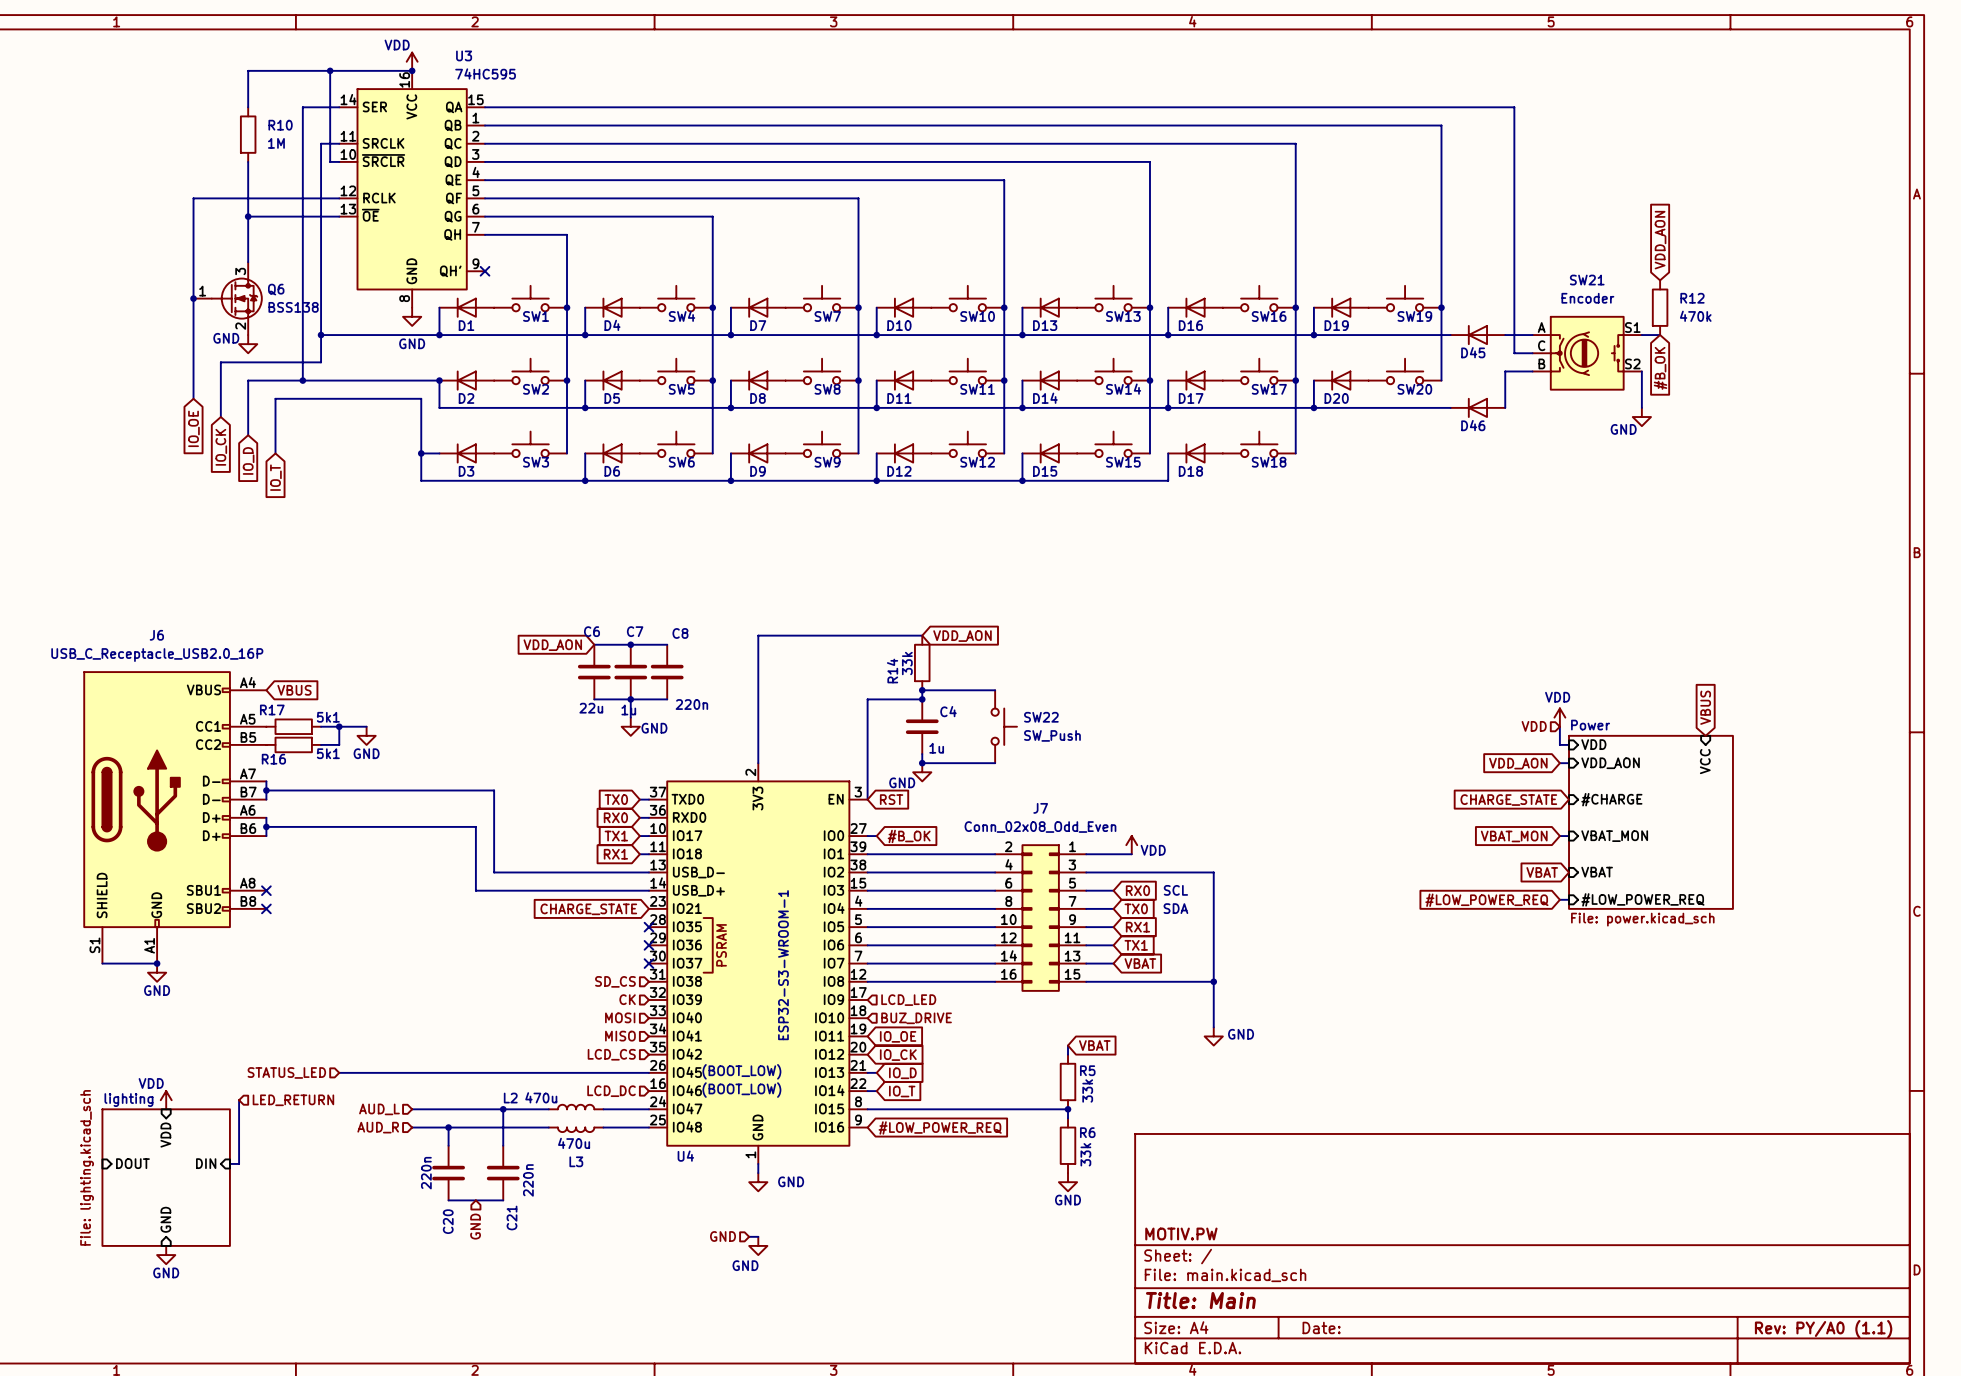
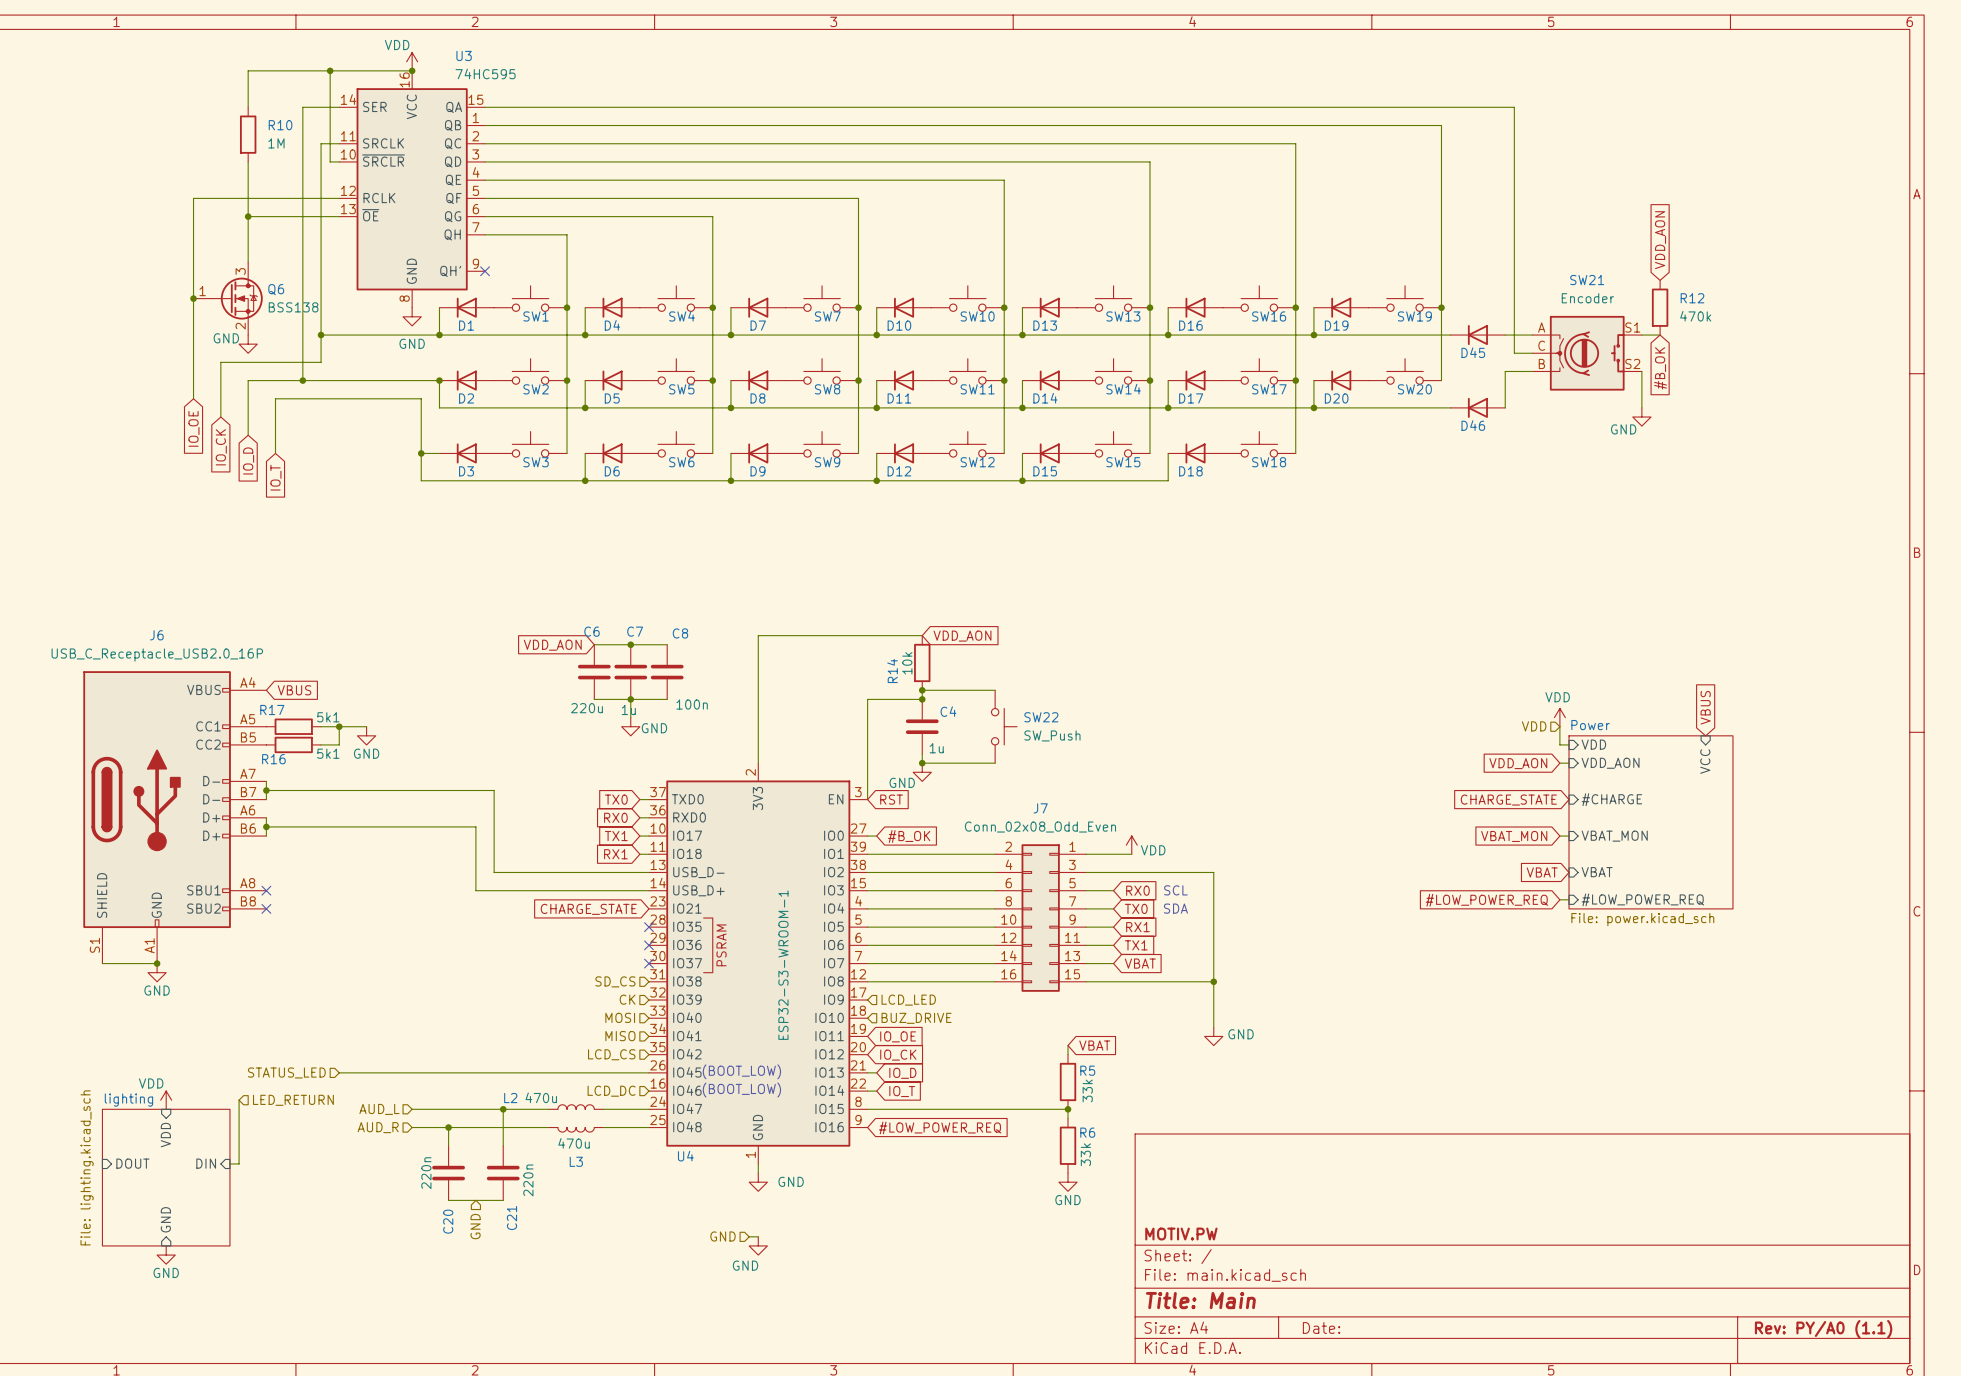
R14 value: 33k (907, 663) -> 10k (907, 663)
C8 value: 220n (691, 704) -> 100n (692, 704)
C6 value: 22u (591, 708) -> 220u (586, 708)

